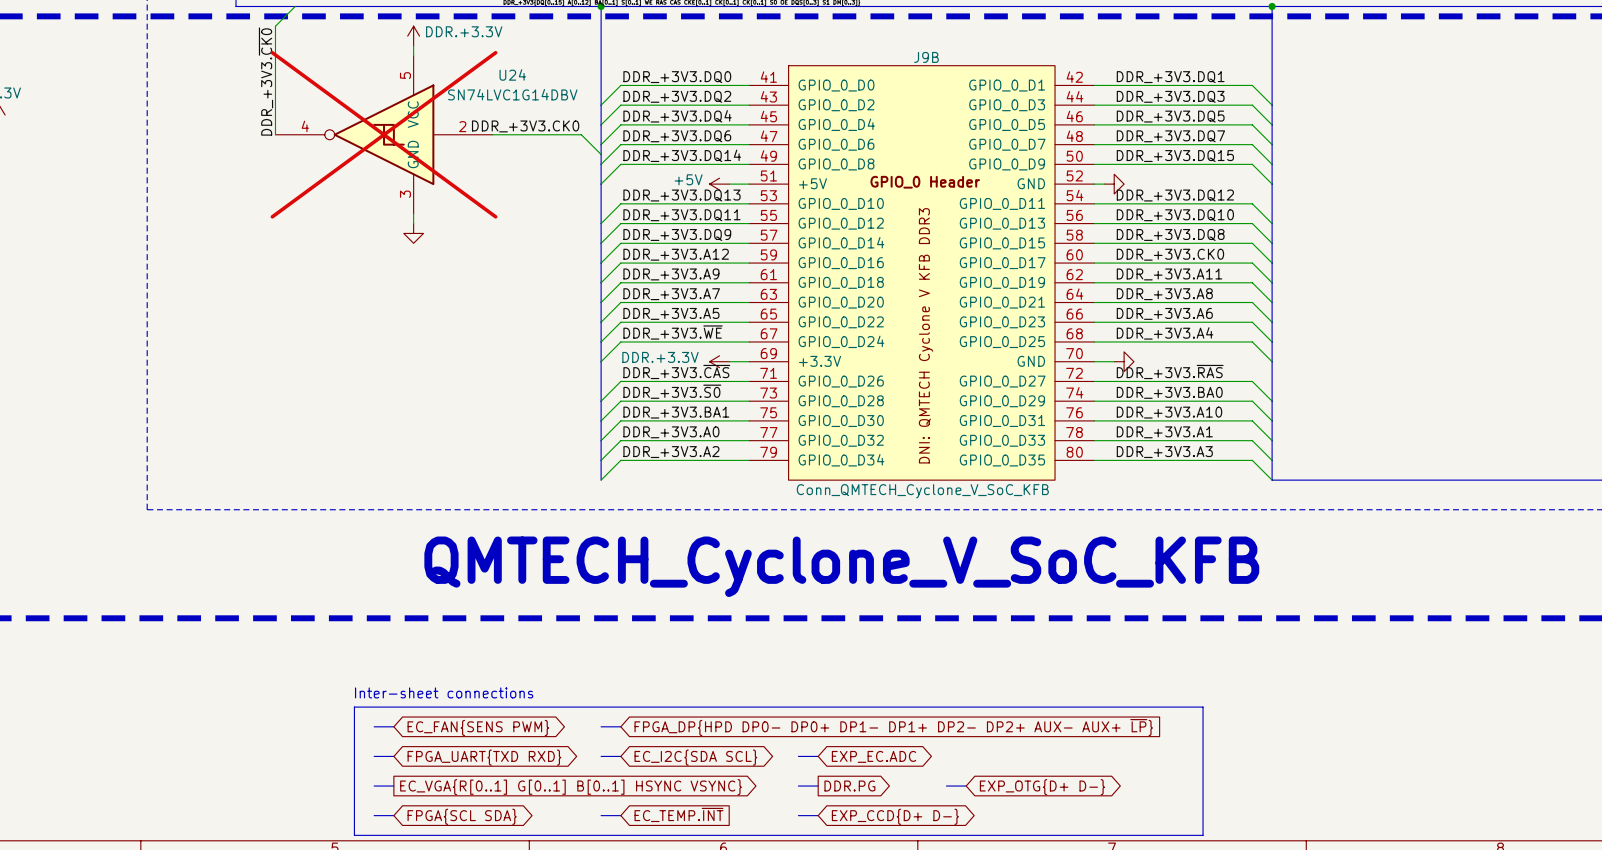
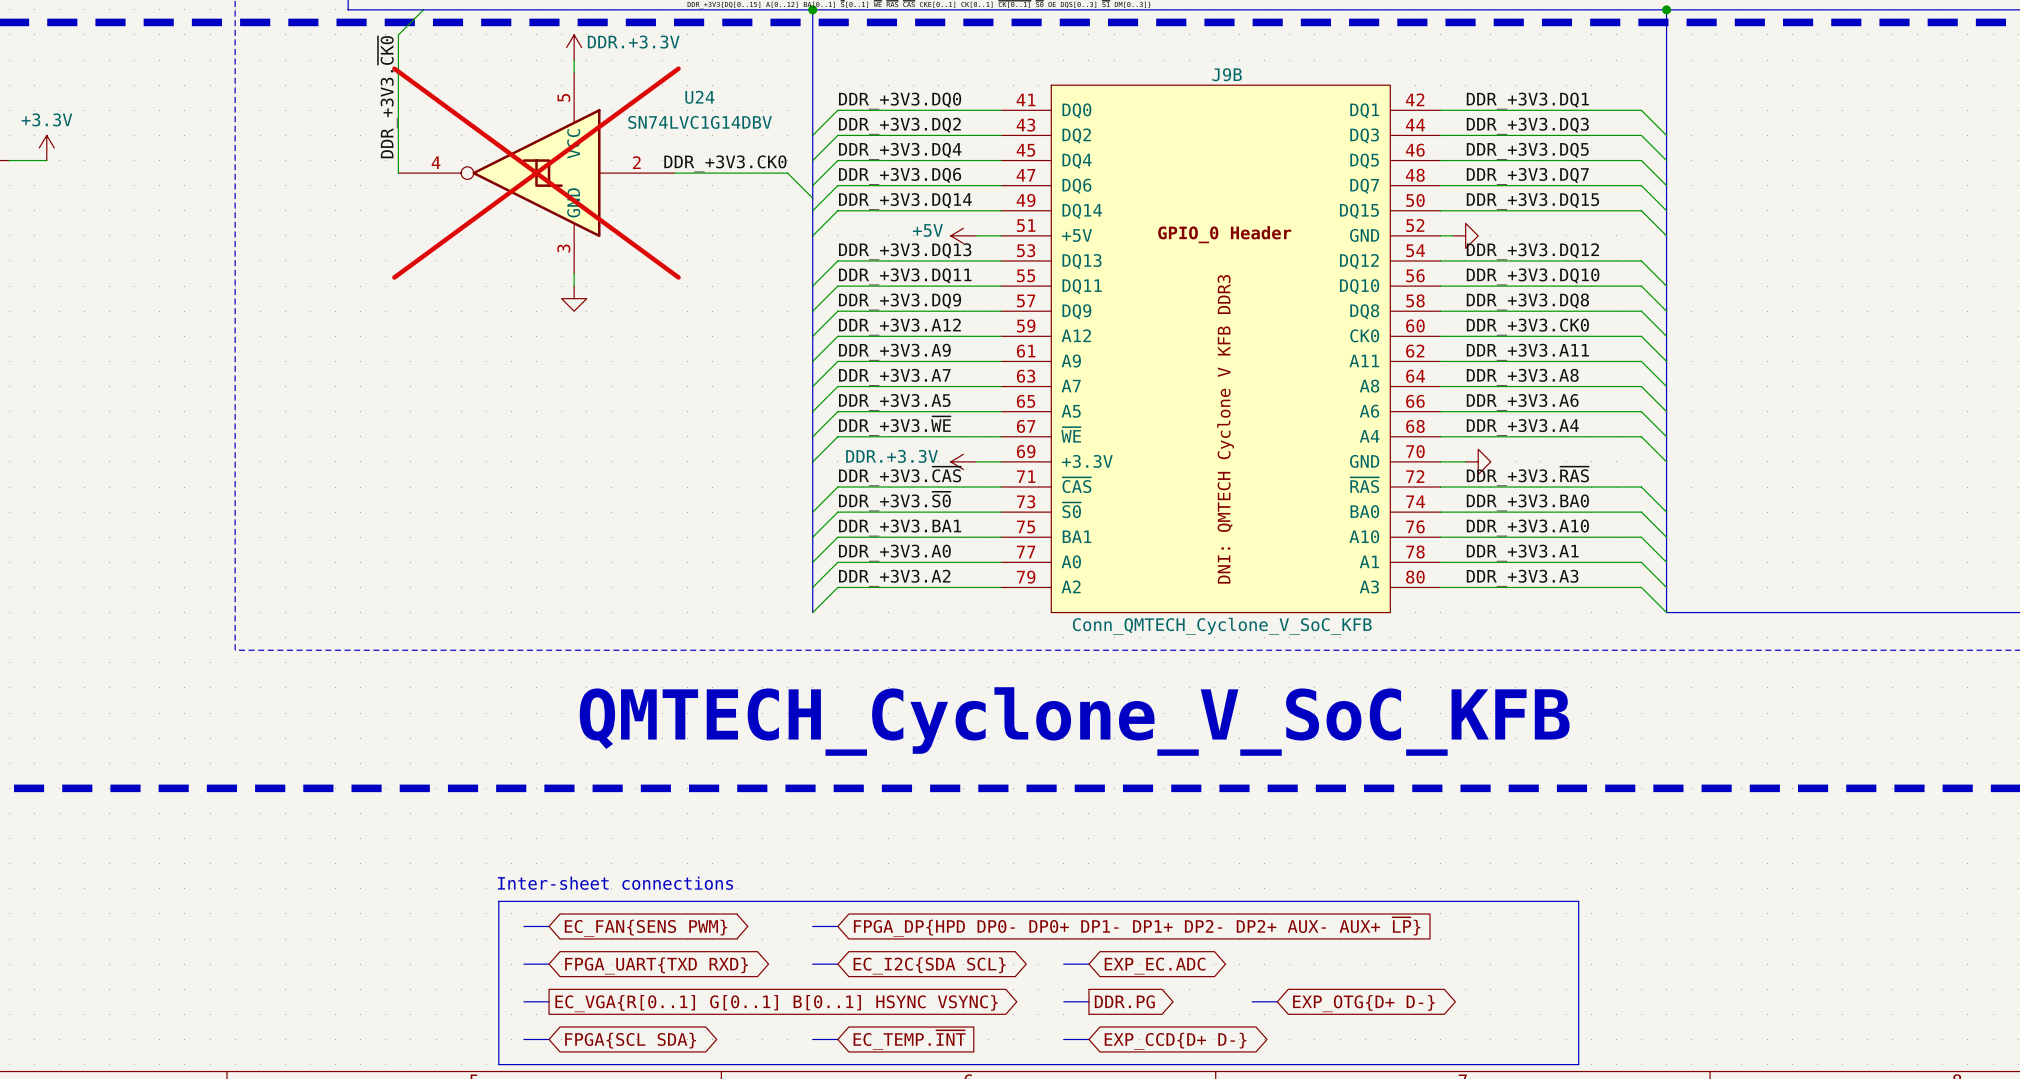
J9B symbol: [749, 65, 1095, 481] -> [1001, 85, 1441, 613]

